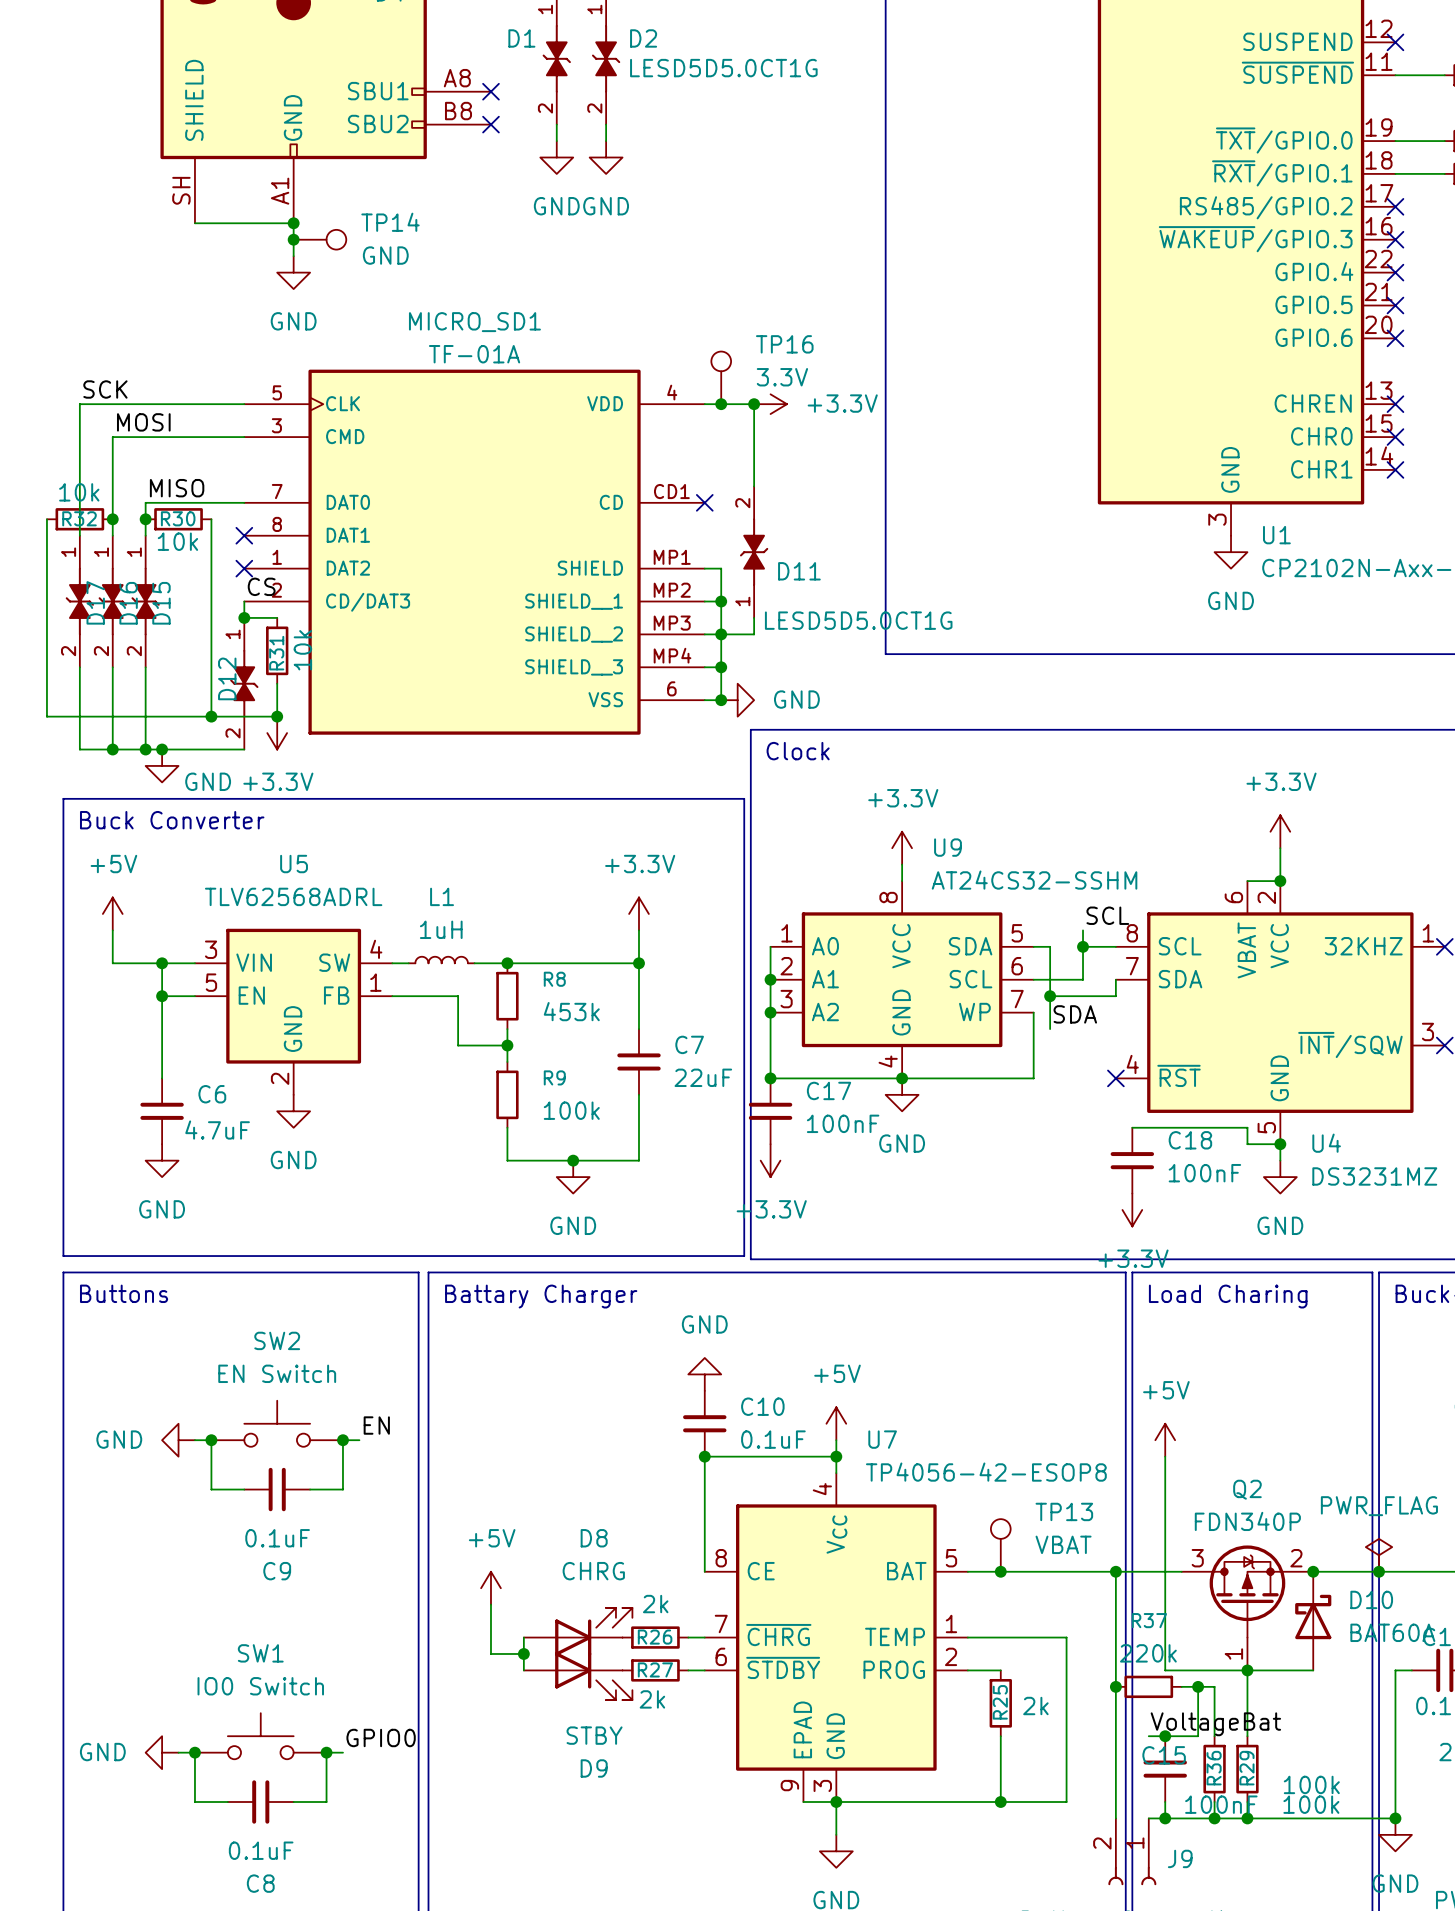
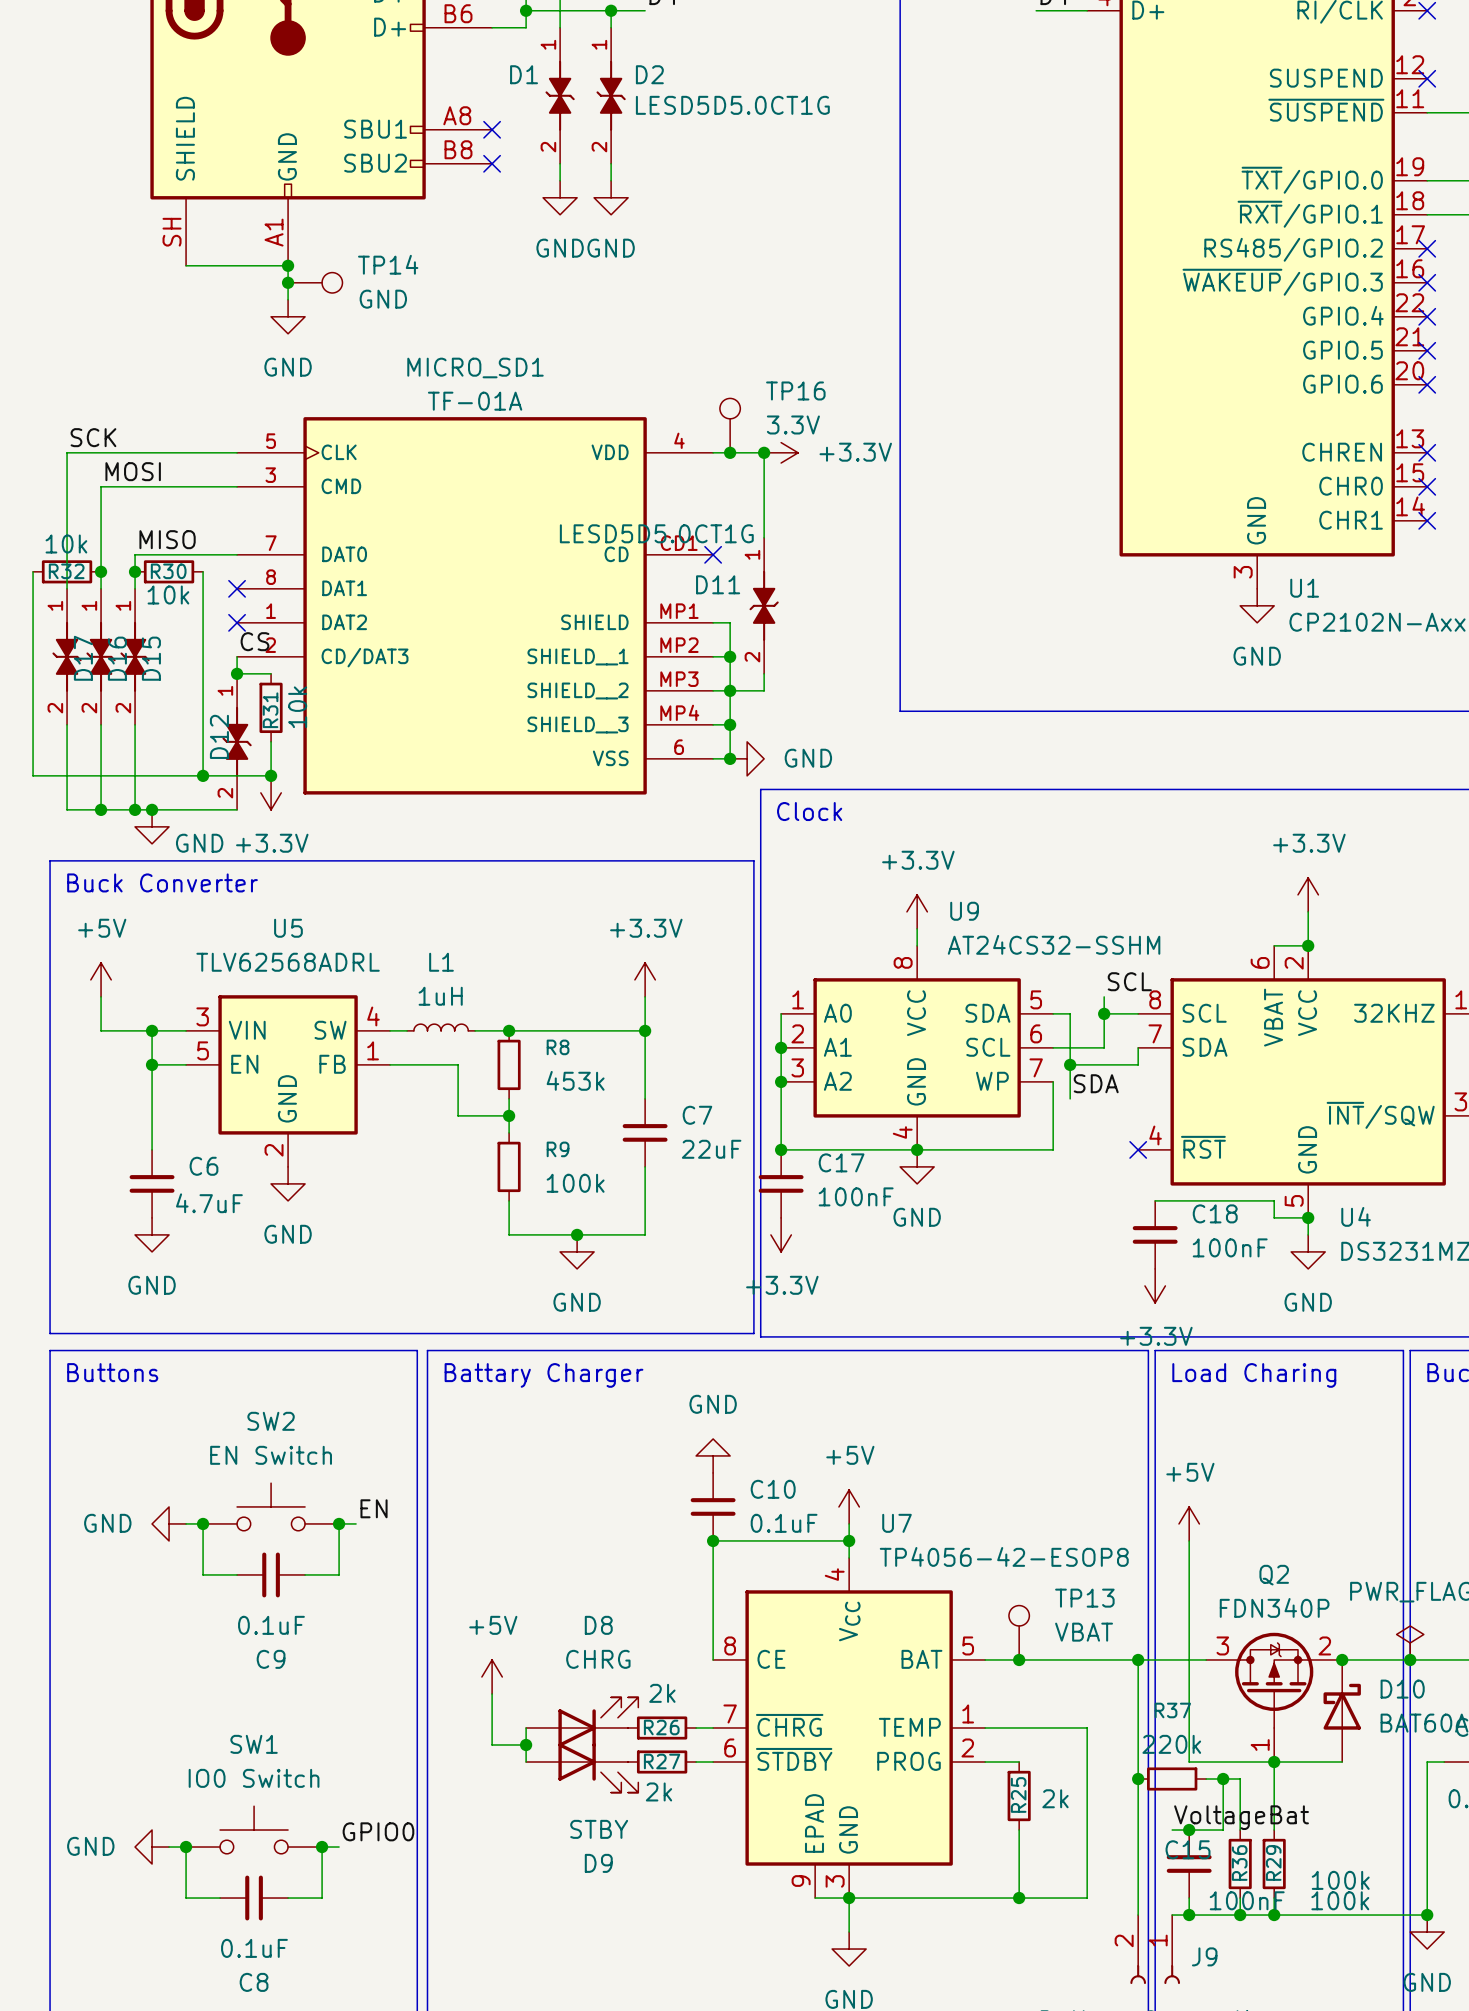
D11 rotation: 0° (754, 552) -> 180° (764, 605)

